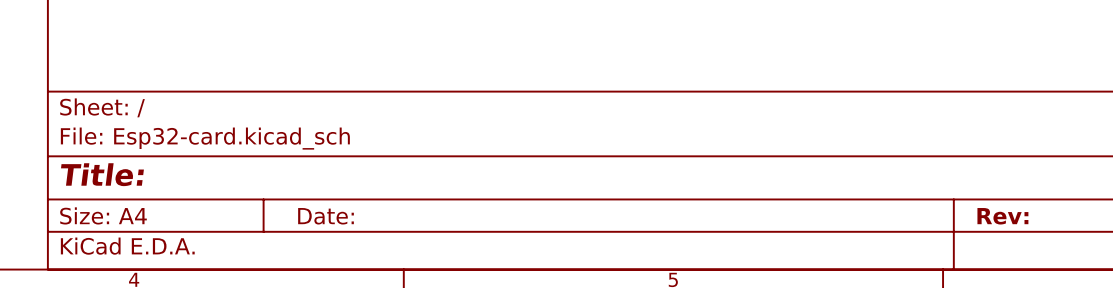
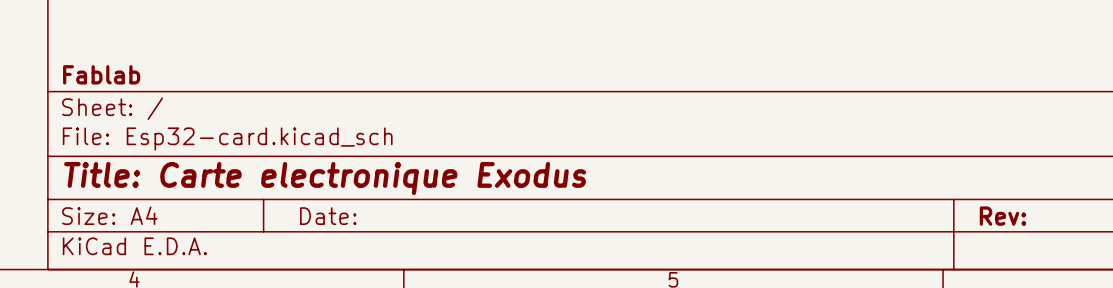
title block: none -> Fablab (101, 74)
title block: Title: (102, 174) -> Title: Carte electronique Exodus (325, 178)

